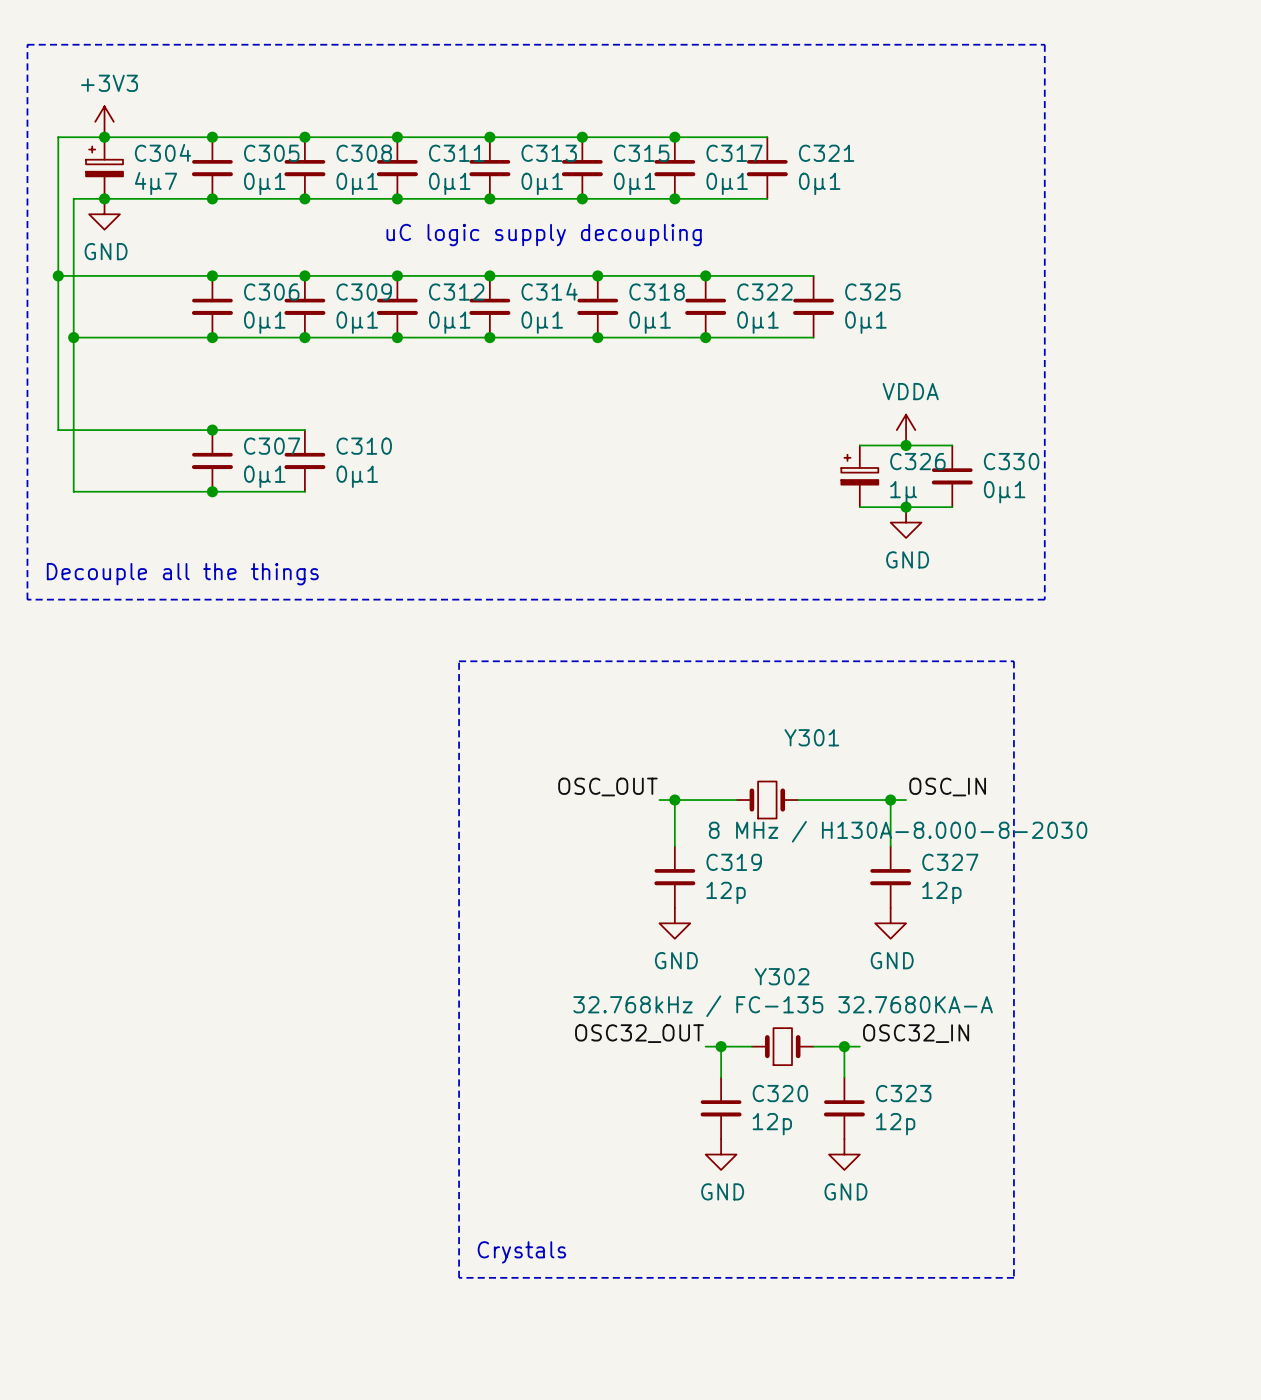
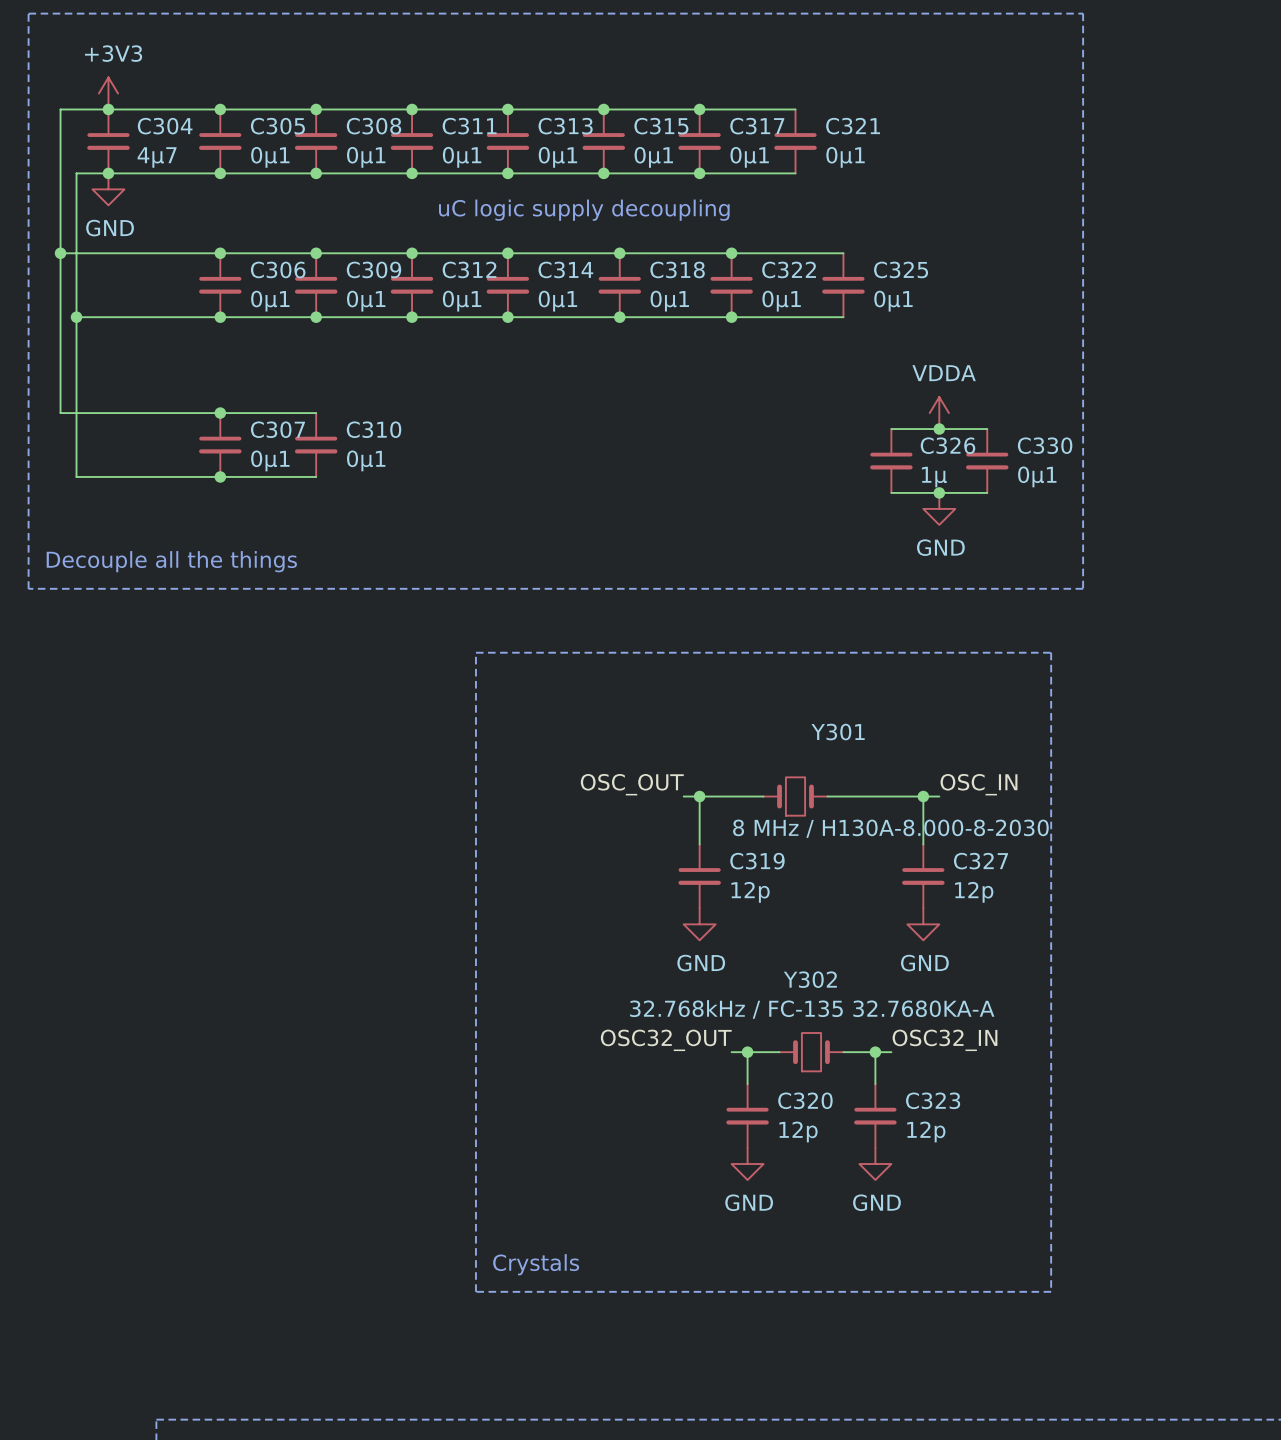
C304 symbol: [86, 137, 124, 199] -> [87, 109, 130, 174]
C326 symbol: [841, 445, 879, 508] -> [870, 429, 913, 493]

